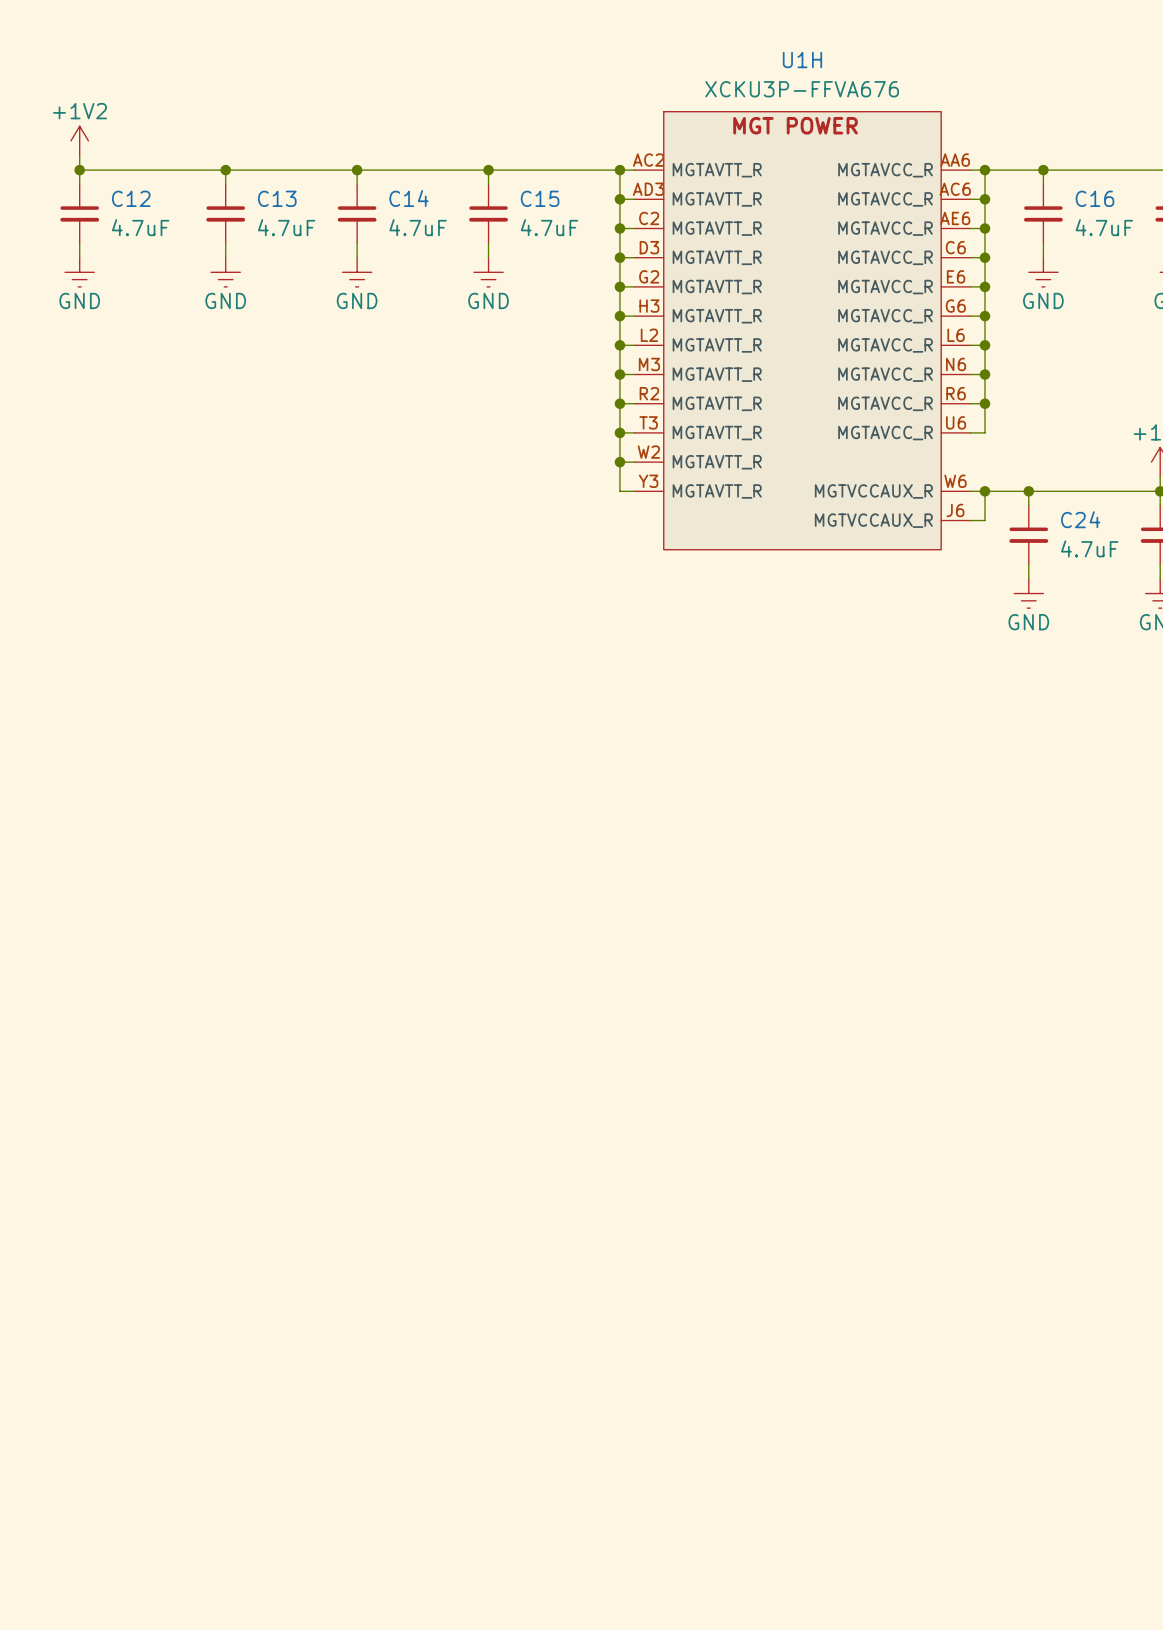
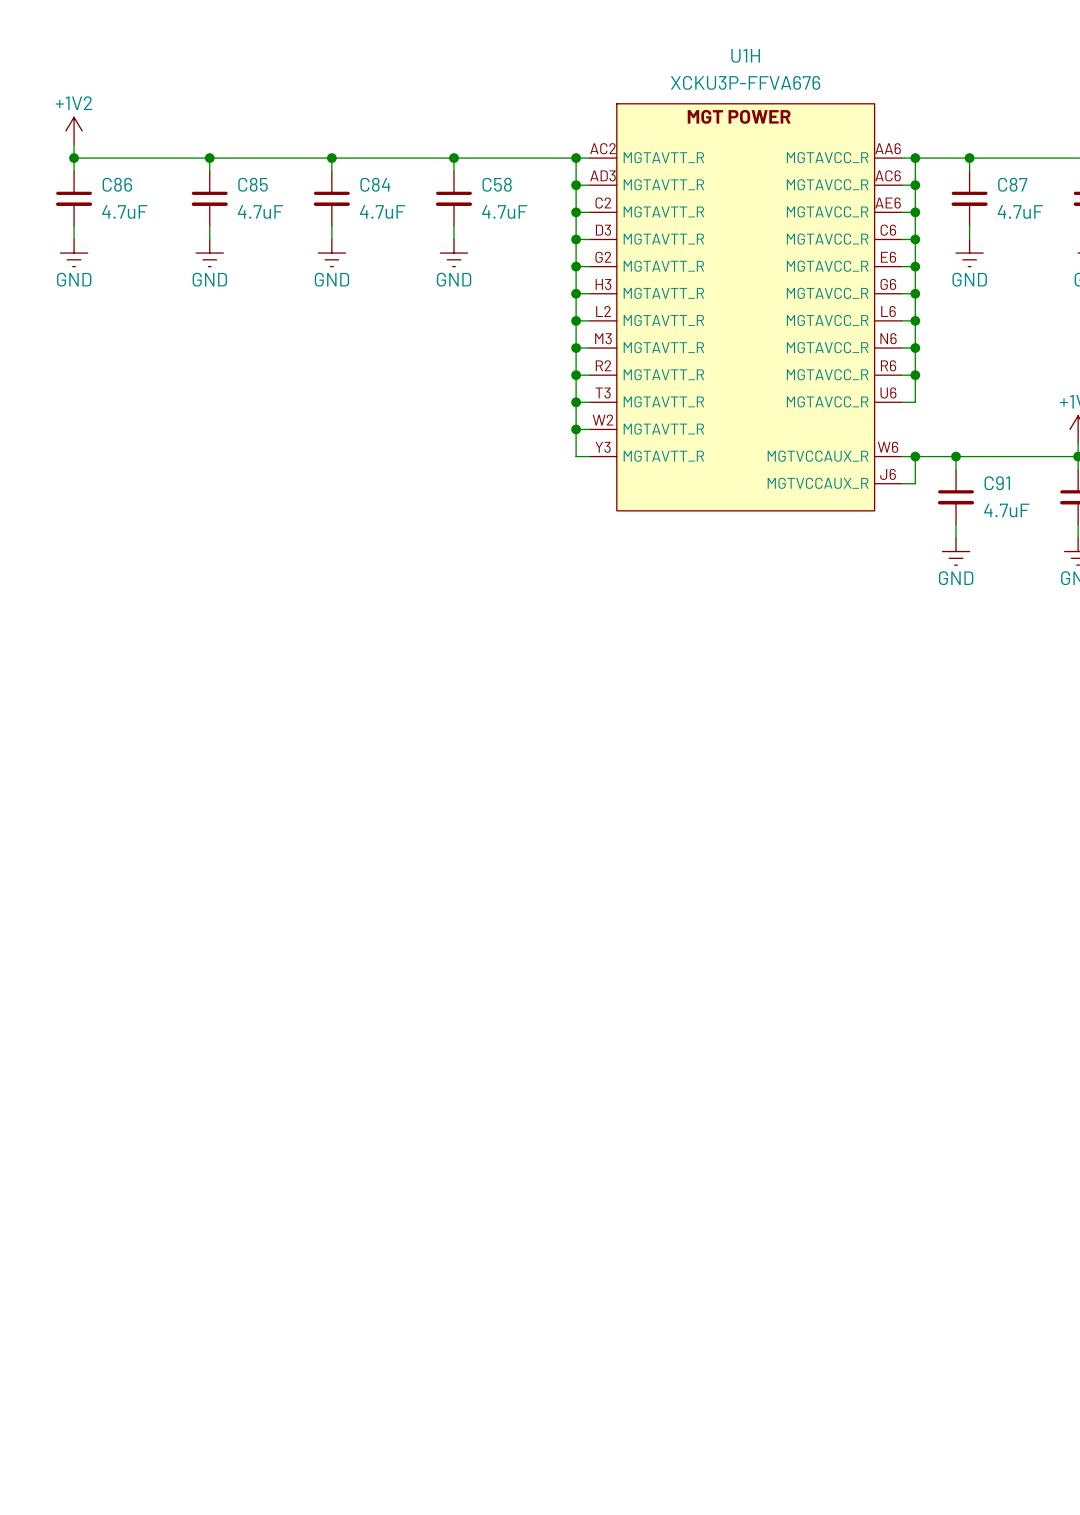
C12 name: C12 (131, 198) -> C86 (117, 184)
C13 name: C13 (277, 198) -> C85 (253, 184)
C14 name: C14 (409, 198) -> C84 (375, 184)
C15 name: C15 (540, 198) -> C58 (497, 184)
C16 name: C16 (1094, 198) -> C87 (1012, 184)
C24 name: C24 (1080, 519) -> C91 (997, 483)

